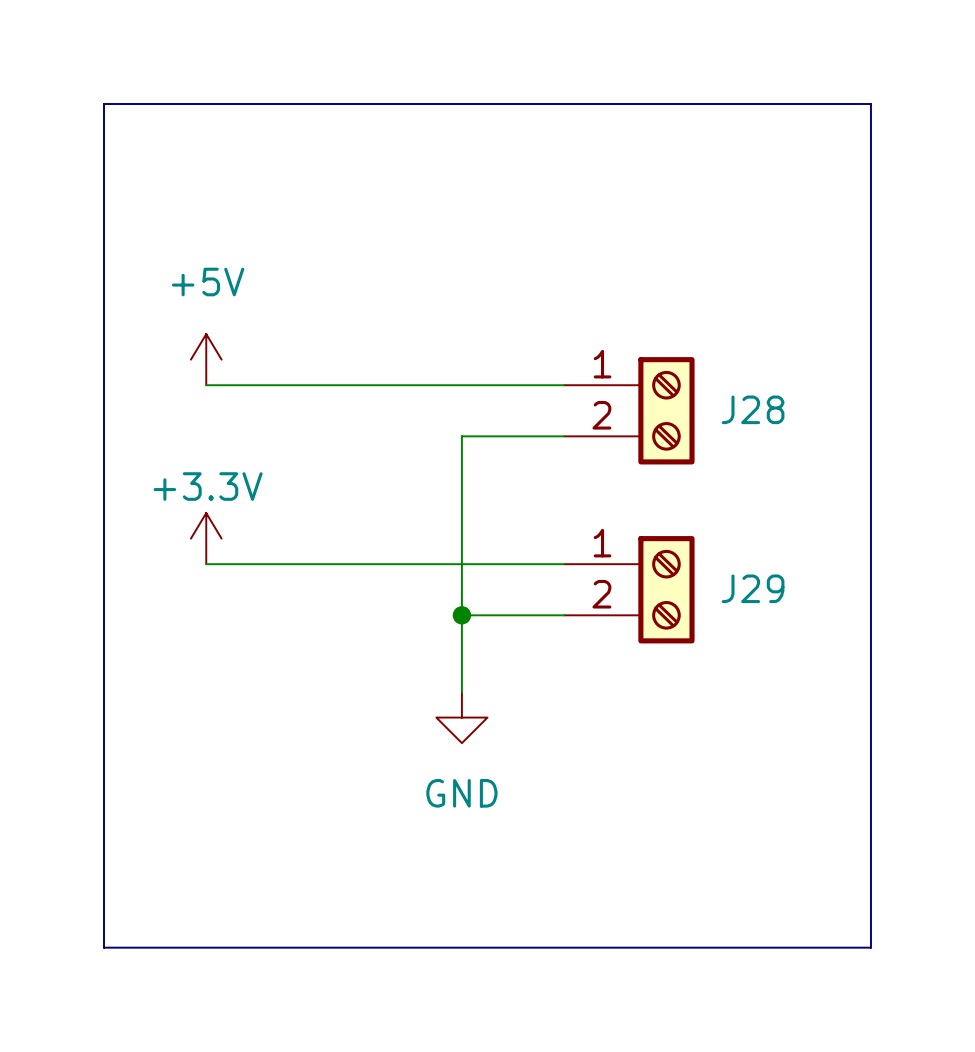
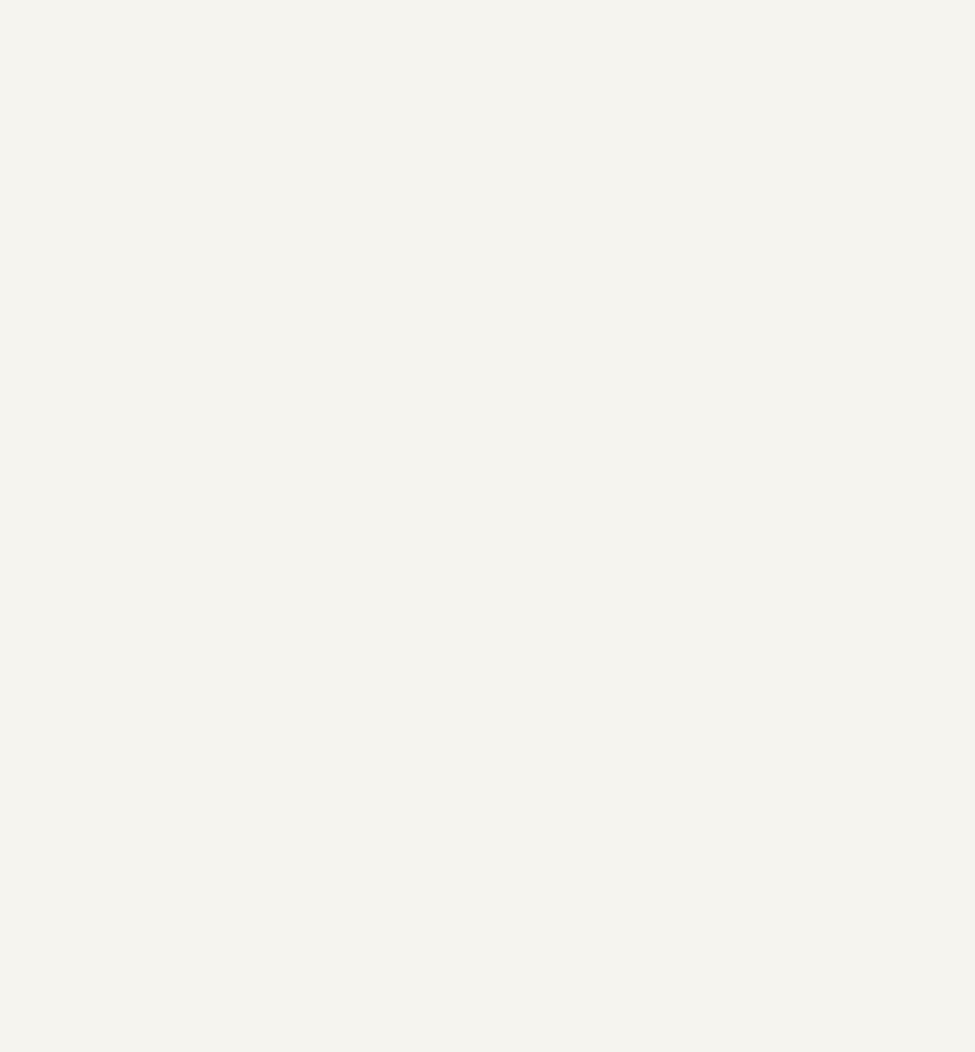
line: (103, 103) (870, 103) (870, 947) (103, 947) (103, 103) -> none
power symbol: +5V (206, 359) -> none
wire: (206, 385) (564, 385) -> none
J28: (629, 410) -> none
wire: (564, 436) (461, 436) (461, 692) -> none
power symbol: +3.3V (206, 538) -> none
wire: (206, 564) (564, 564) -> none
J29: (629, 589) -> none
wire: (461, 615) (564, 615) -> none
junction: (461, 615) -> none
power symbol: GND (461, 717) -> none

